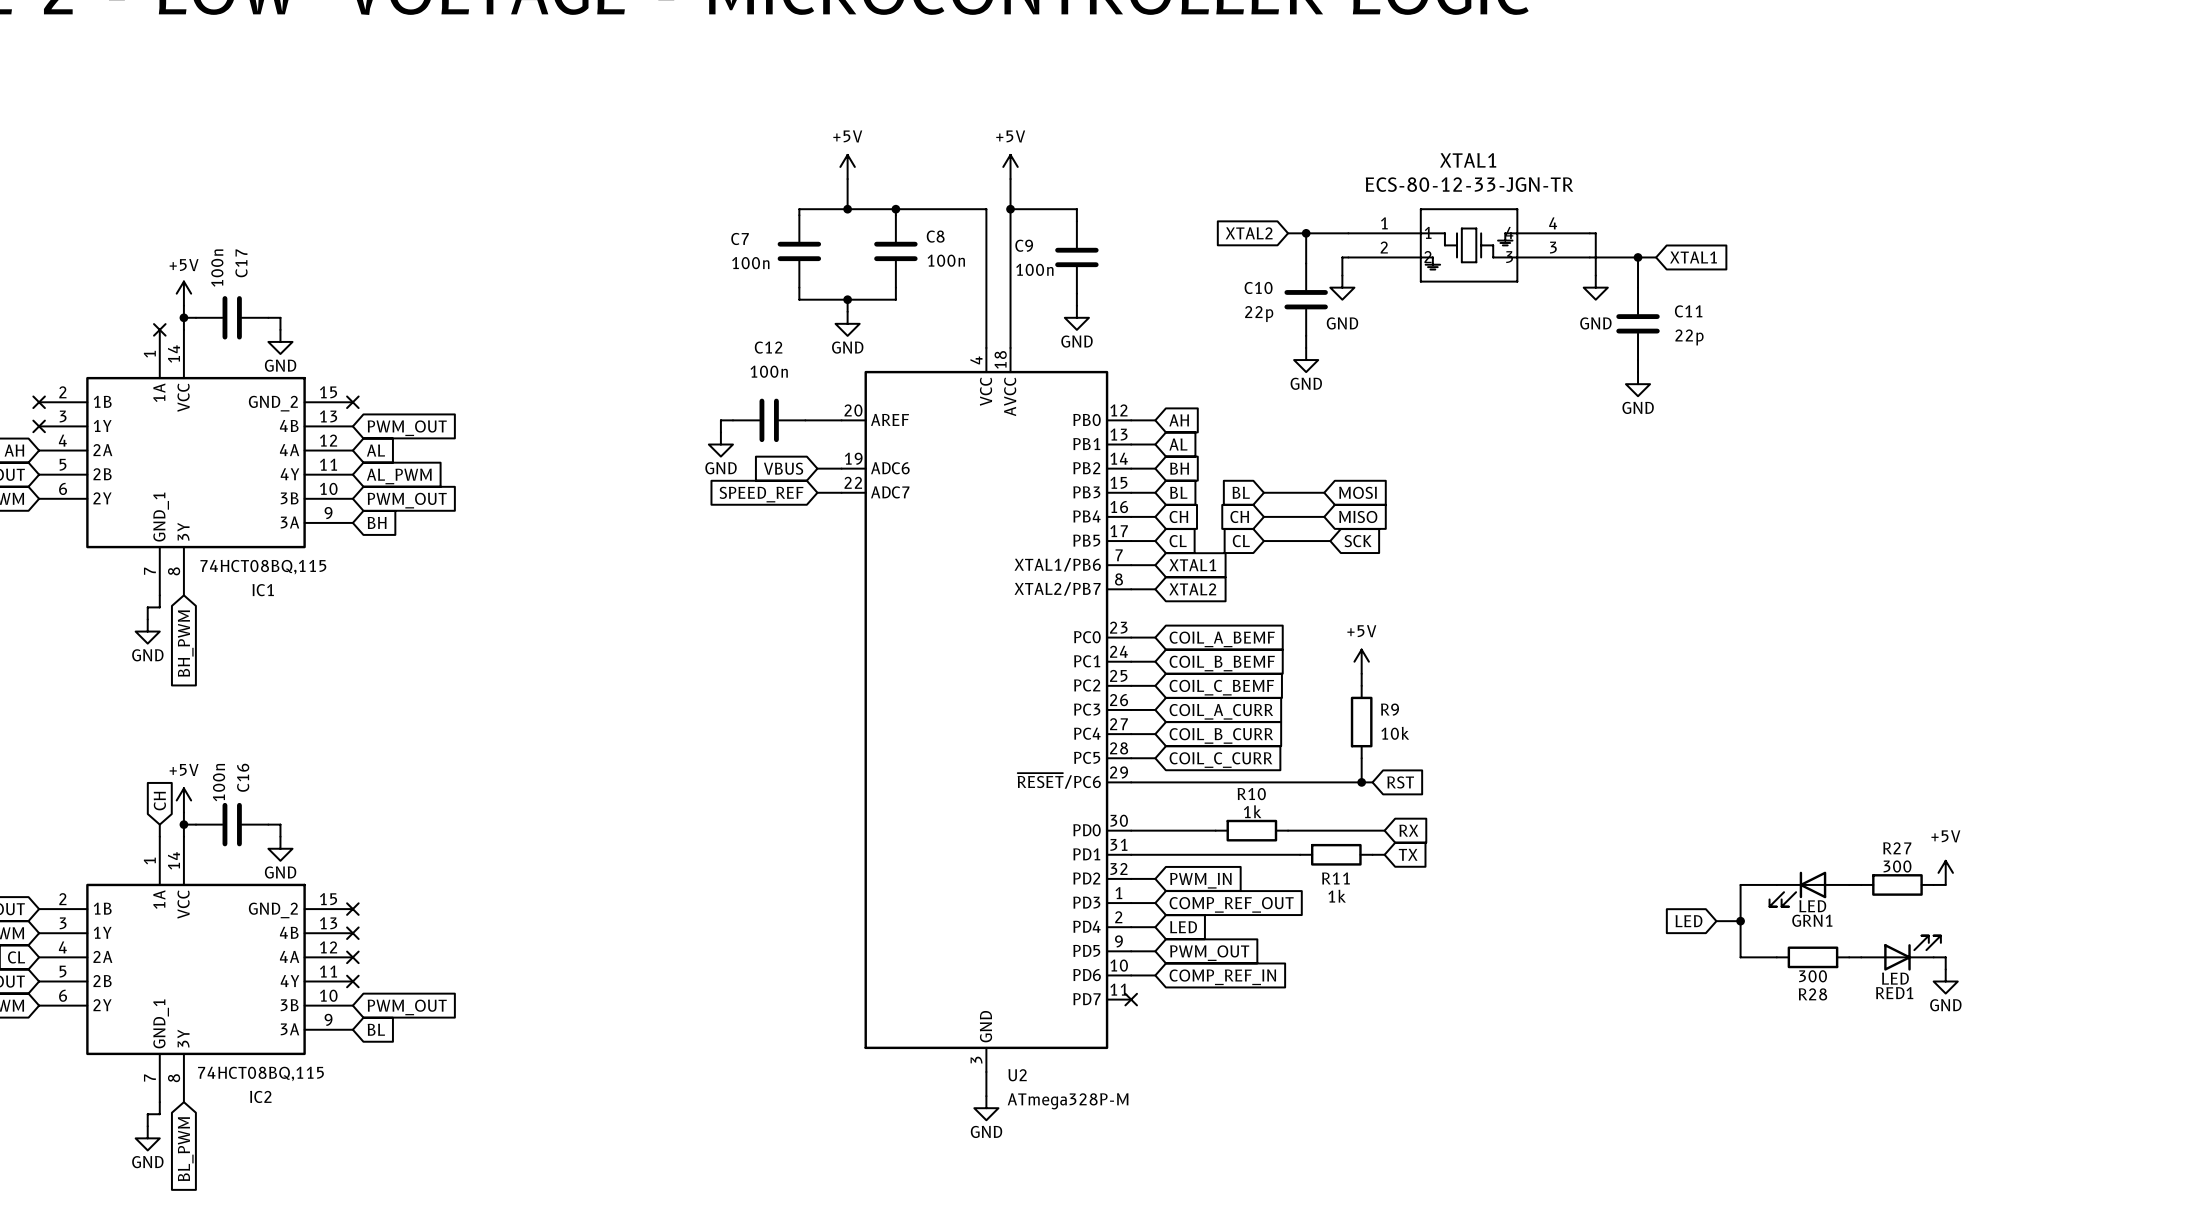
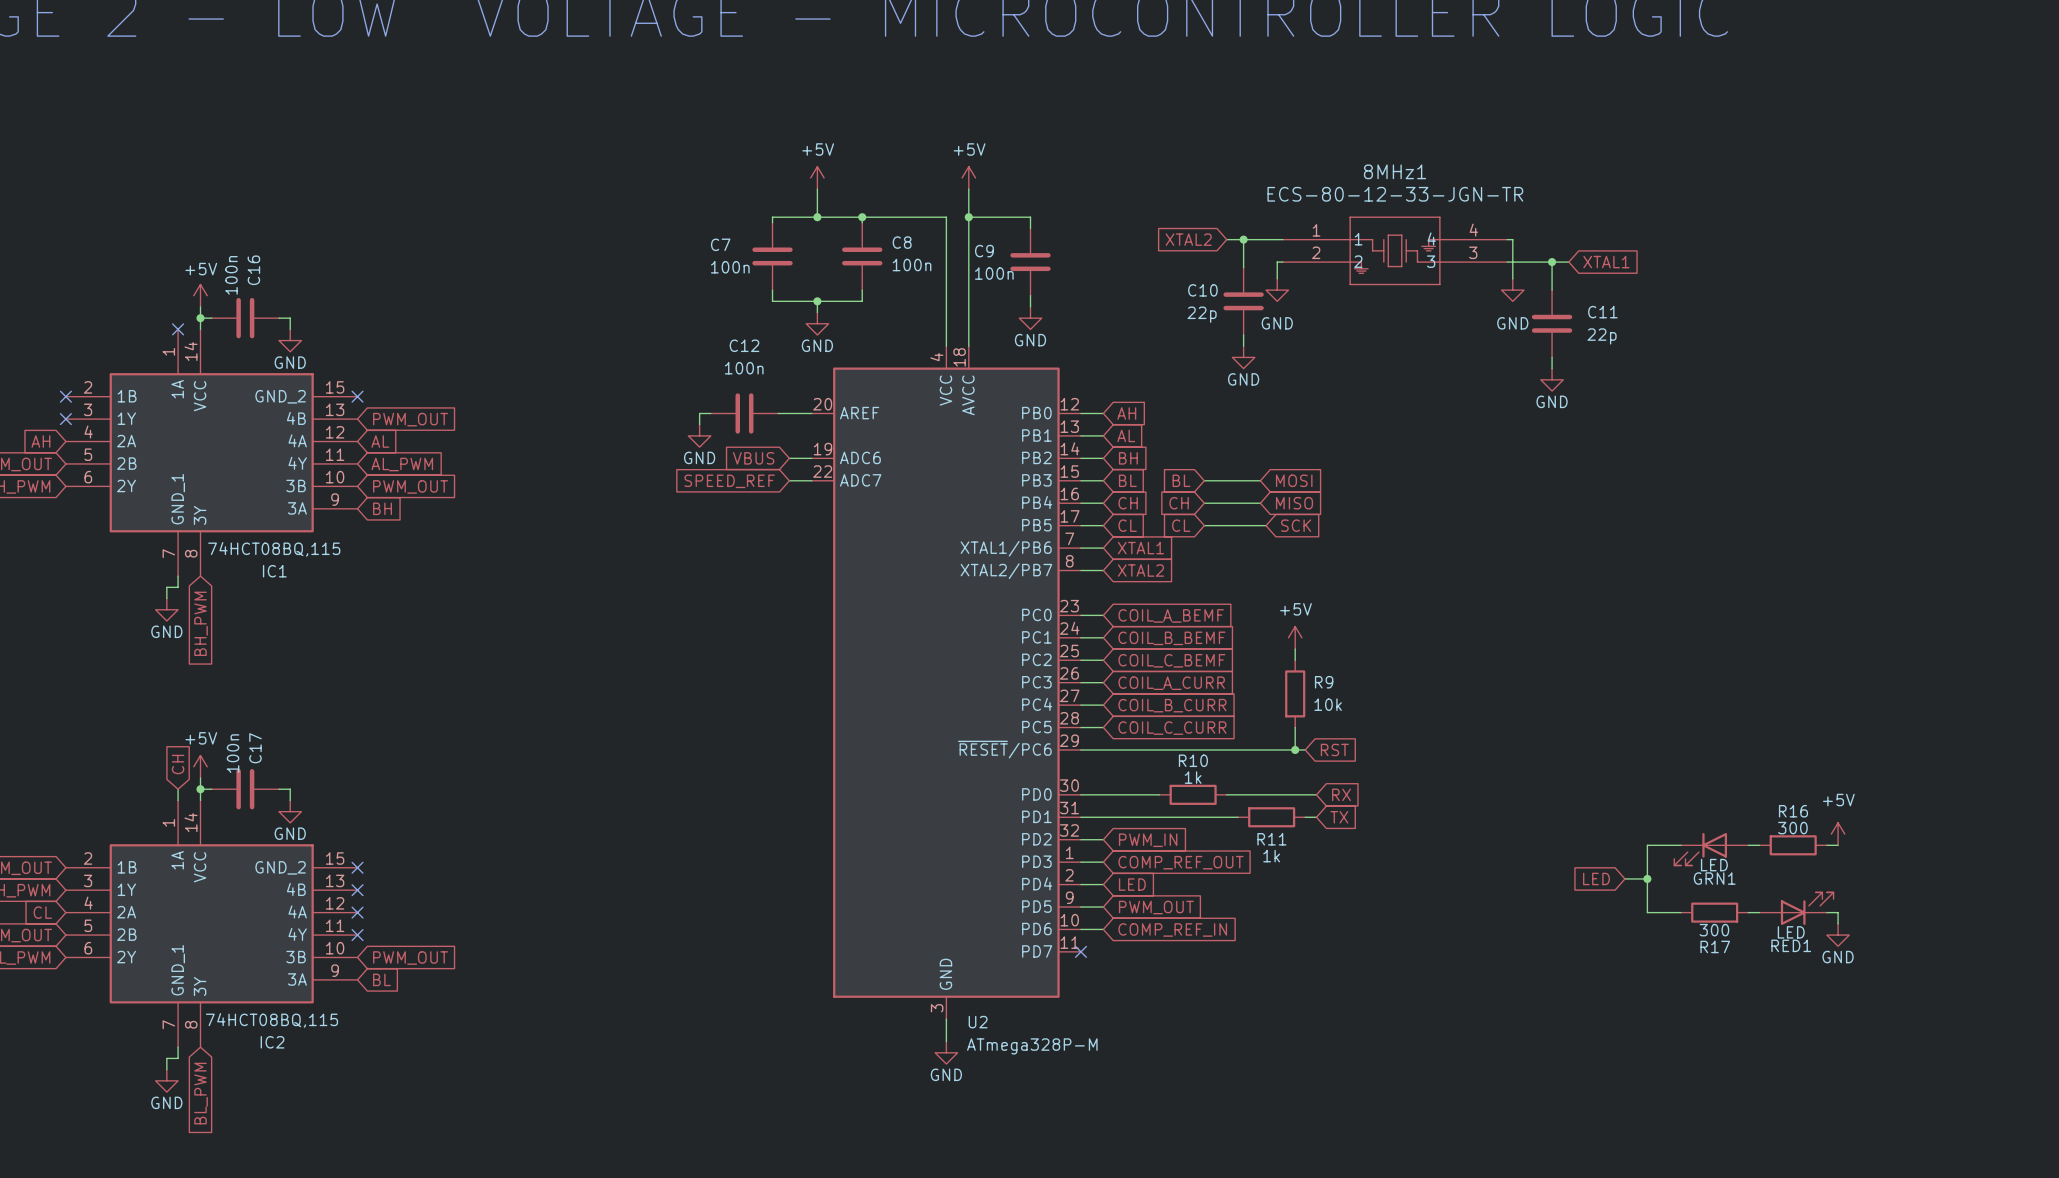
XTAL1 name: XTAL1 (1468, 160) -> 8MHz1 (1395, 171)
C17 name: C17 (241, 263) -> C16 (253, 270)
C16 name: C16 (243, 777) -> C17 (255, 748)
R27 name: R27 (1897, 848) -> R16 (1793, 811)
R28 name: R28 (1812, 994) -> R17 (1715, 946)

